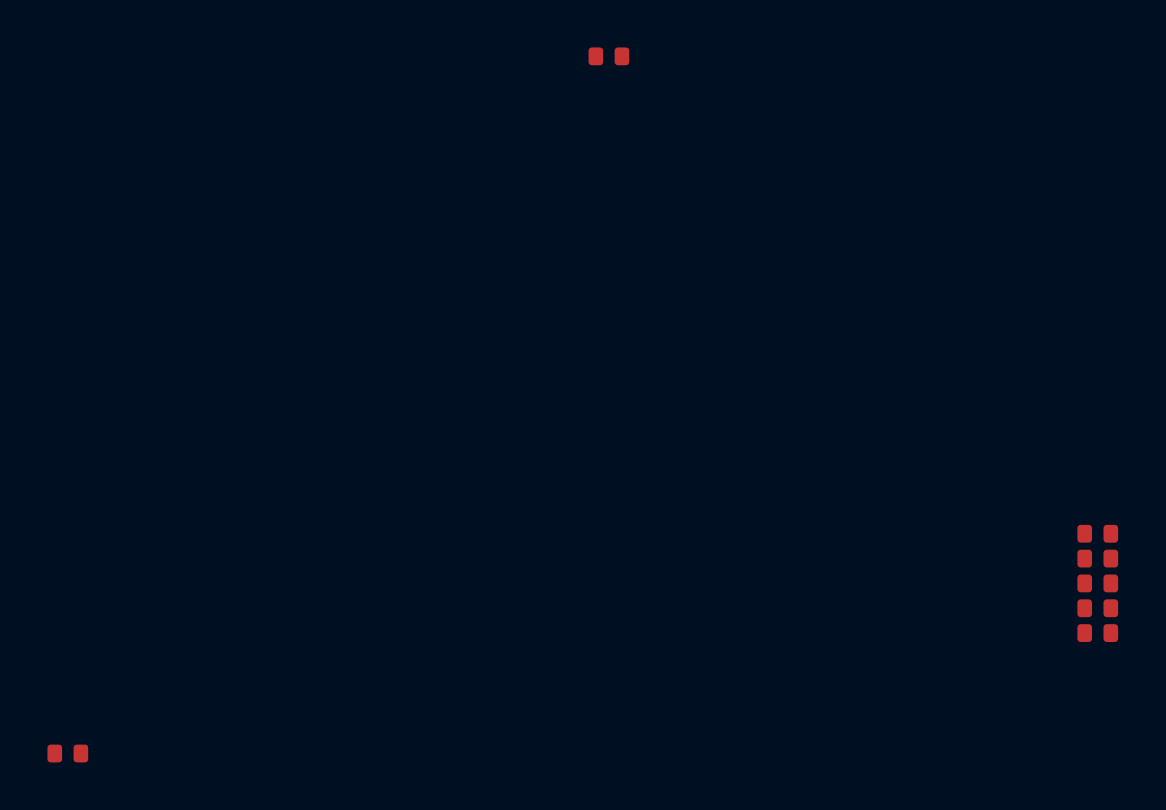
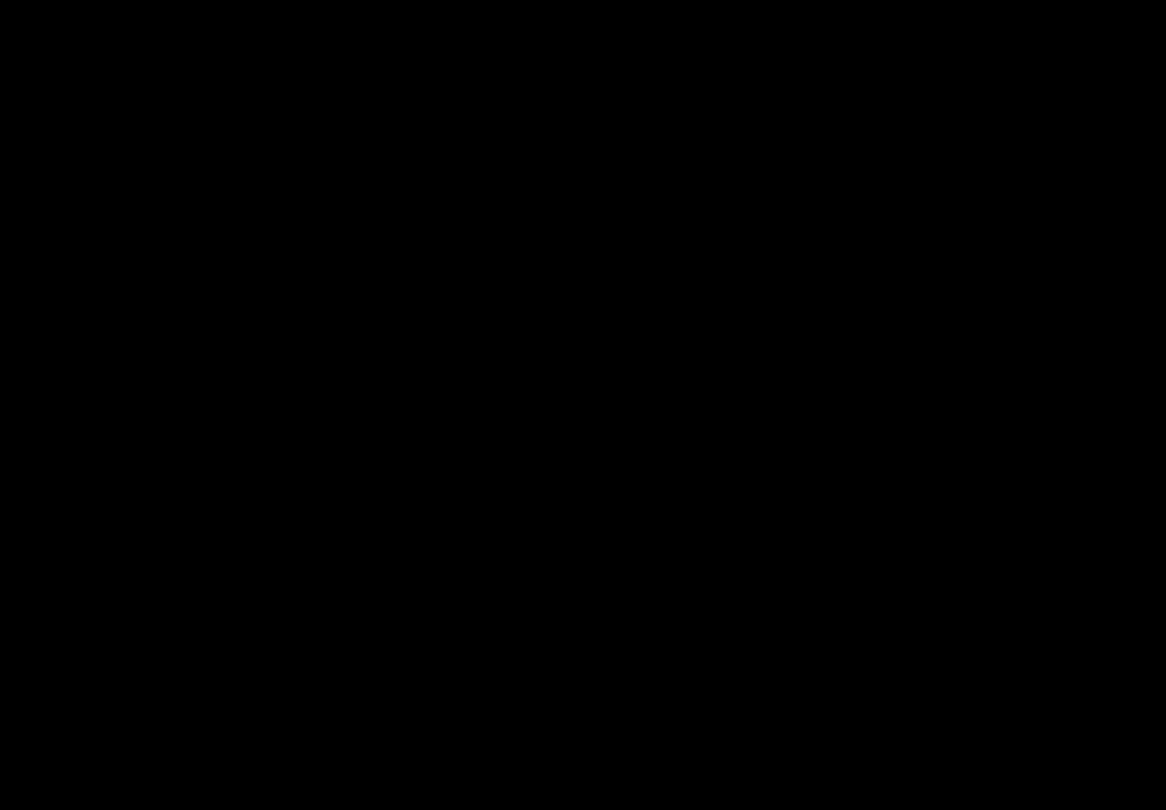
part: (608, 56) -> none
part: (1097, 533) -> none
part: (1097, 558) -> none
part: (1097, 583) -> none
part: (1097, 608) -> none
part: (1097, 633) -> none
part: (67, 753) -> none

